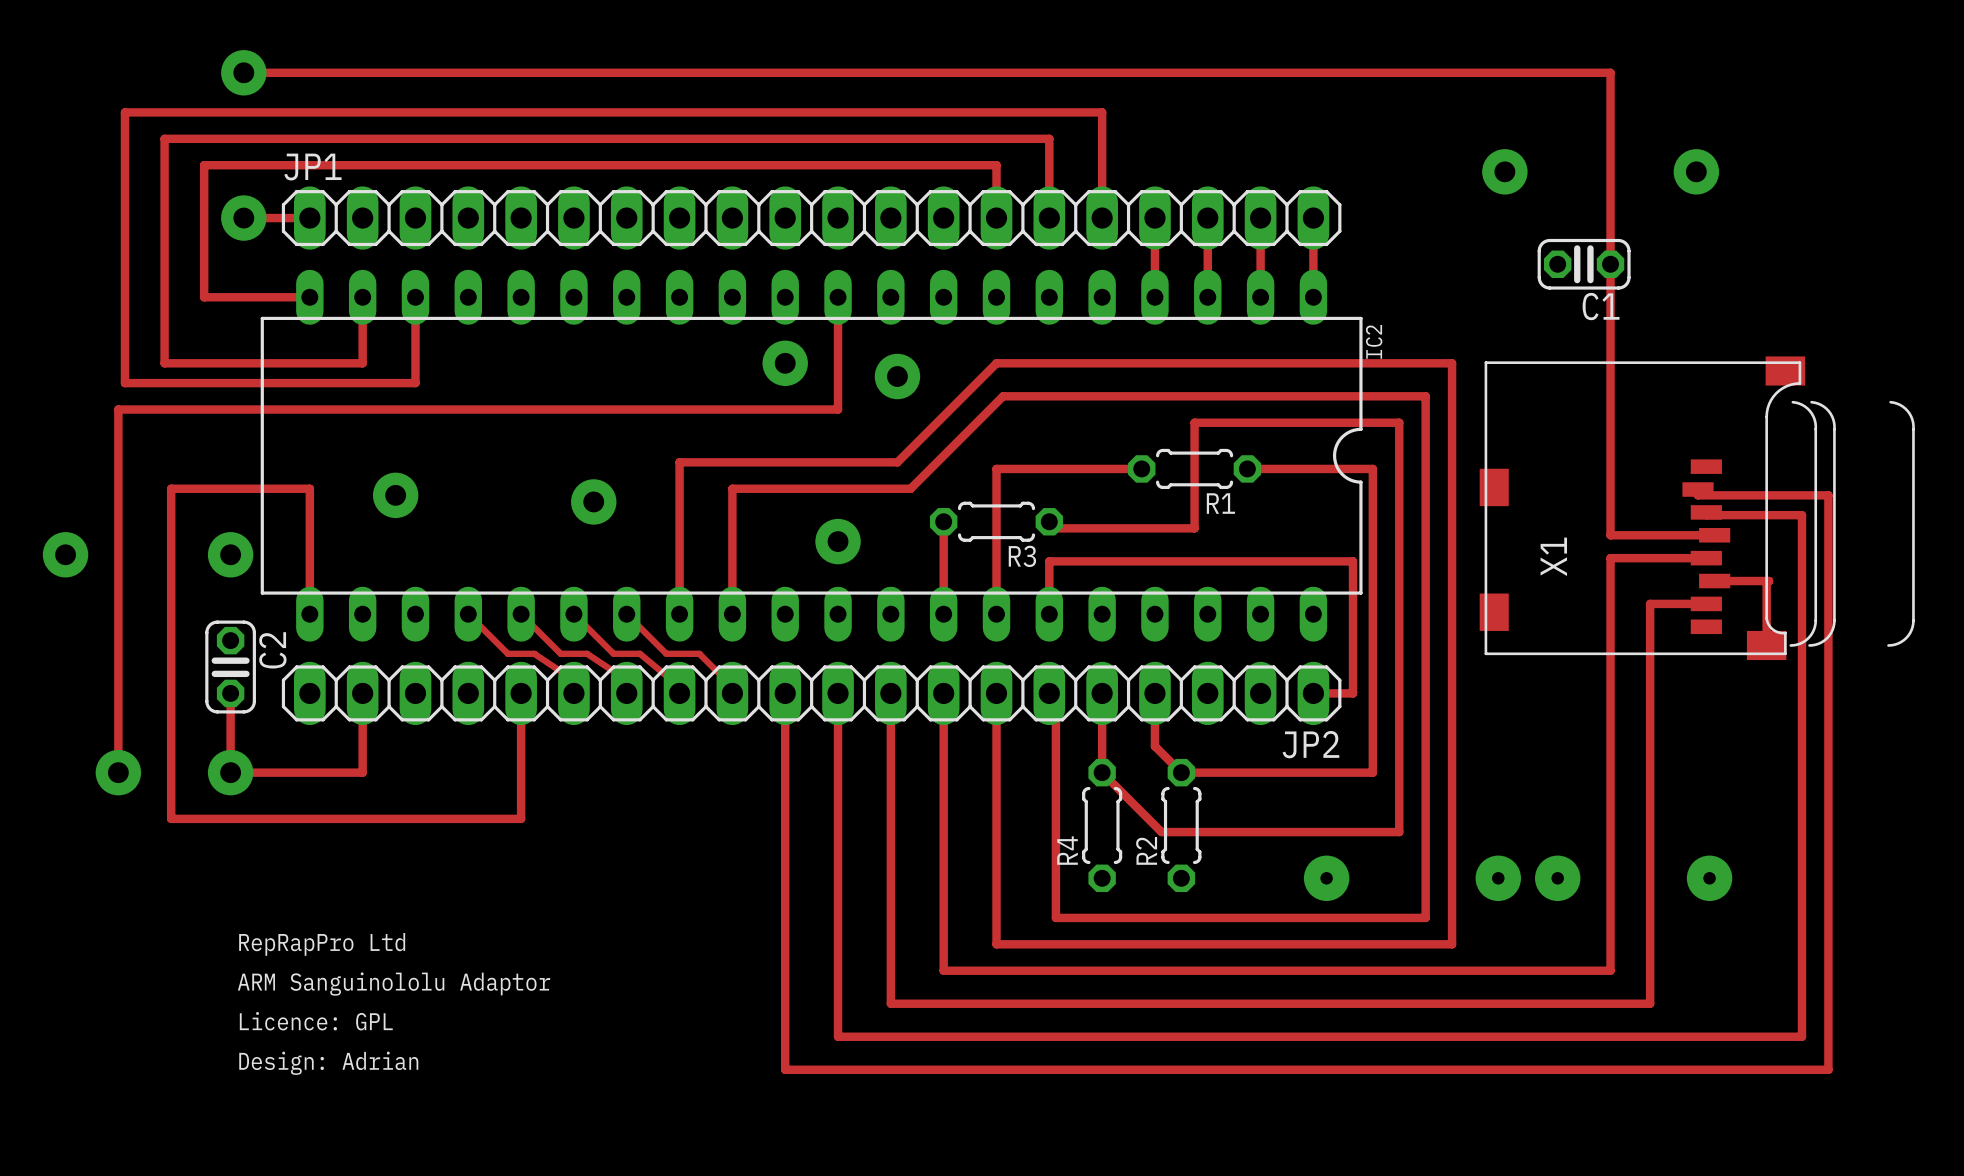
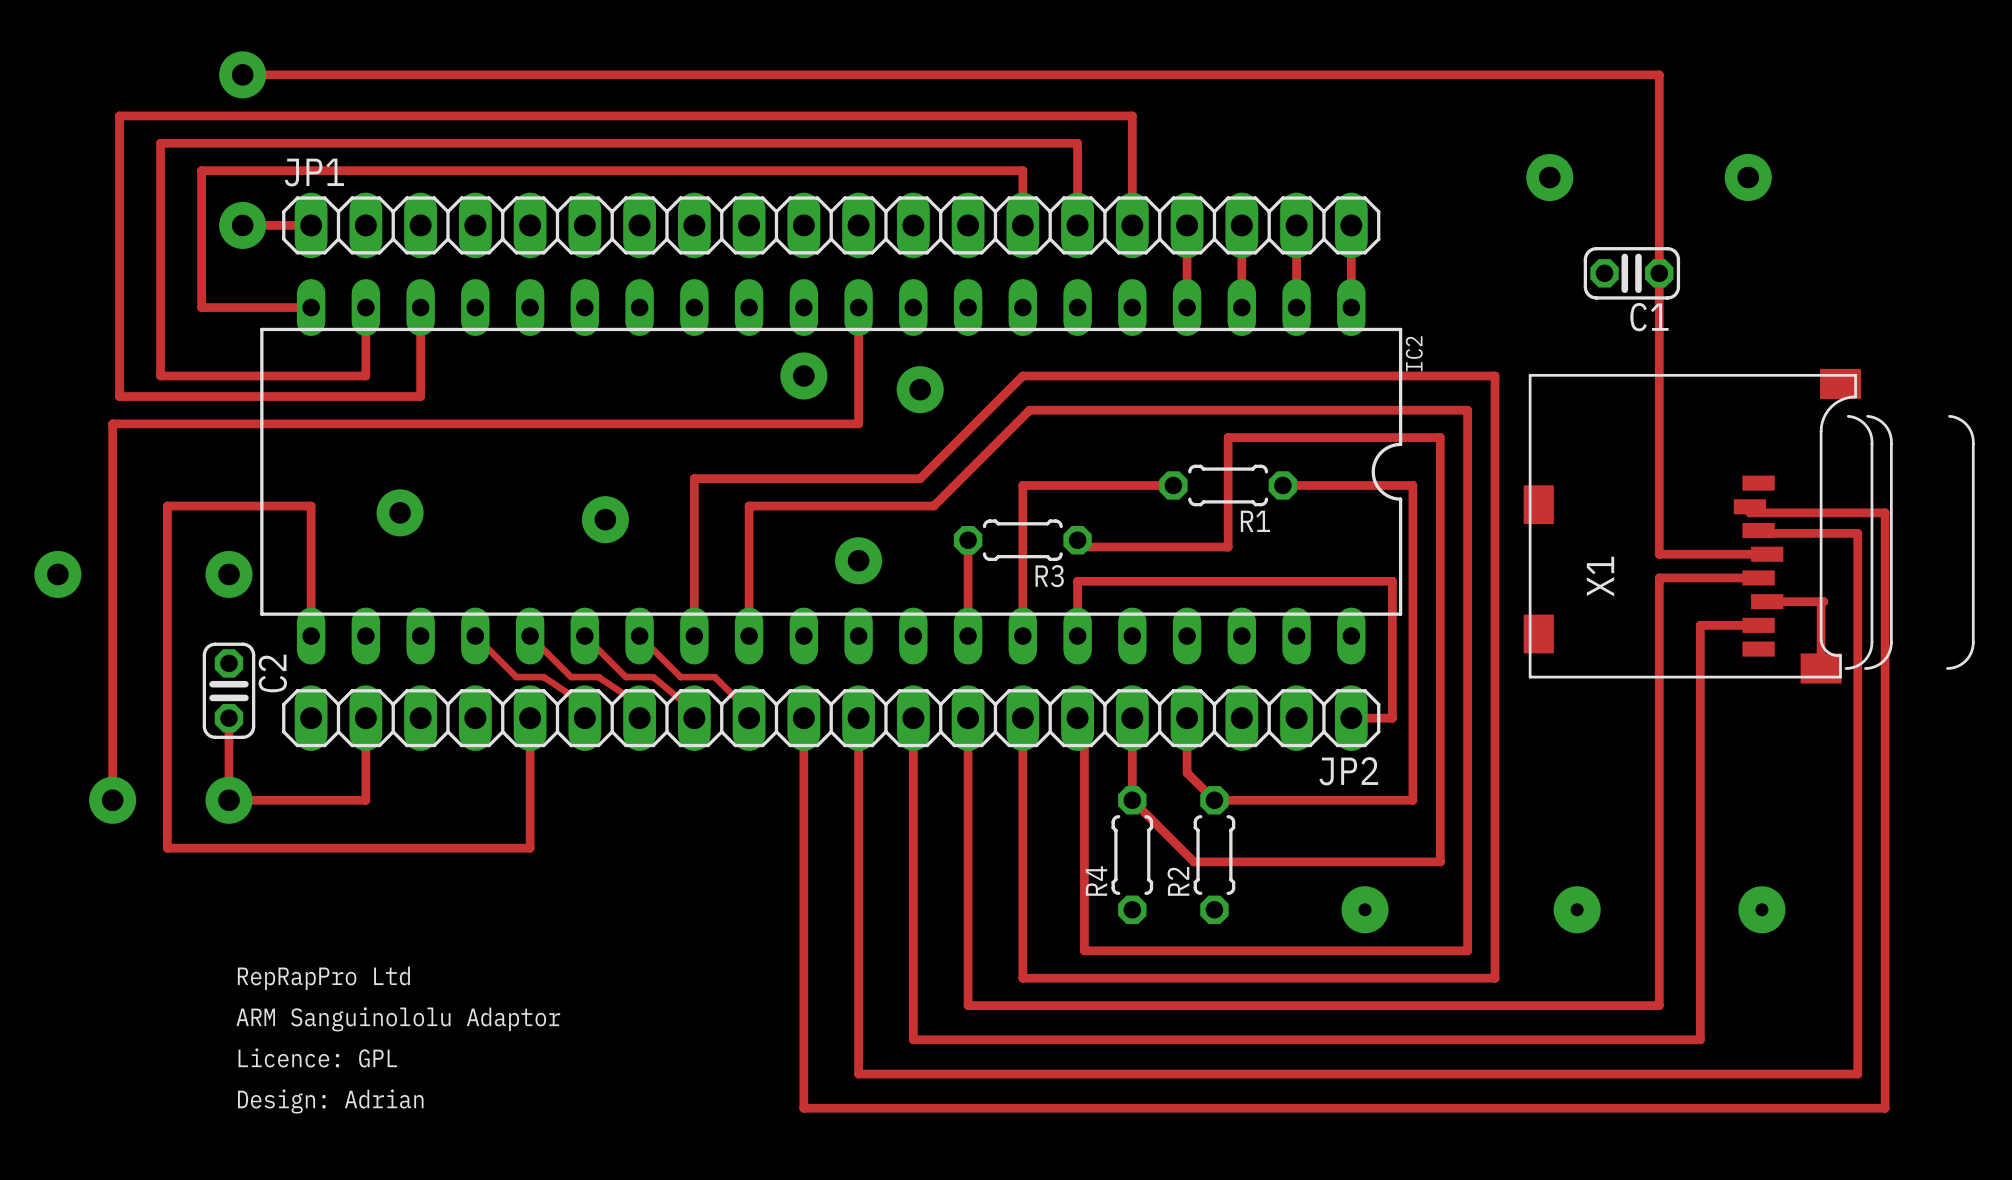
via: (1498, 878) -> none
via: none -> (1577, 909)
via: (1557, 878) -> none

